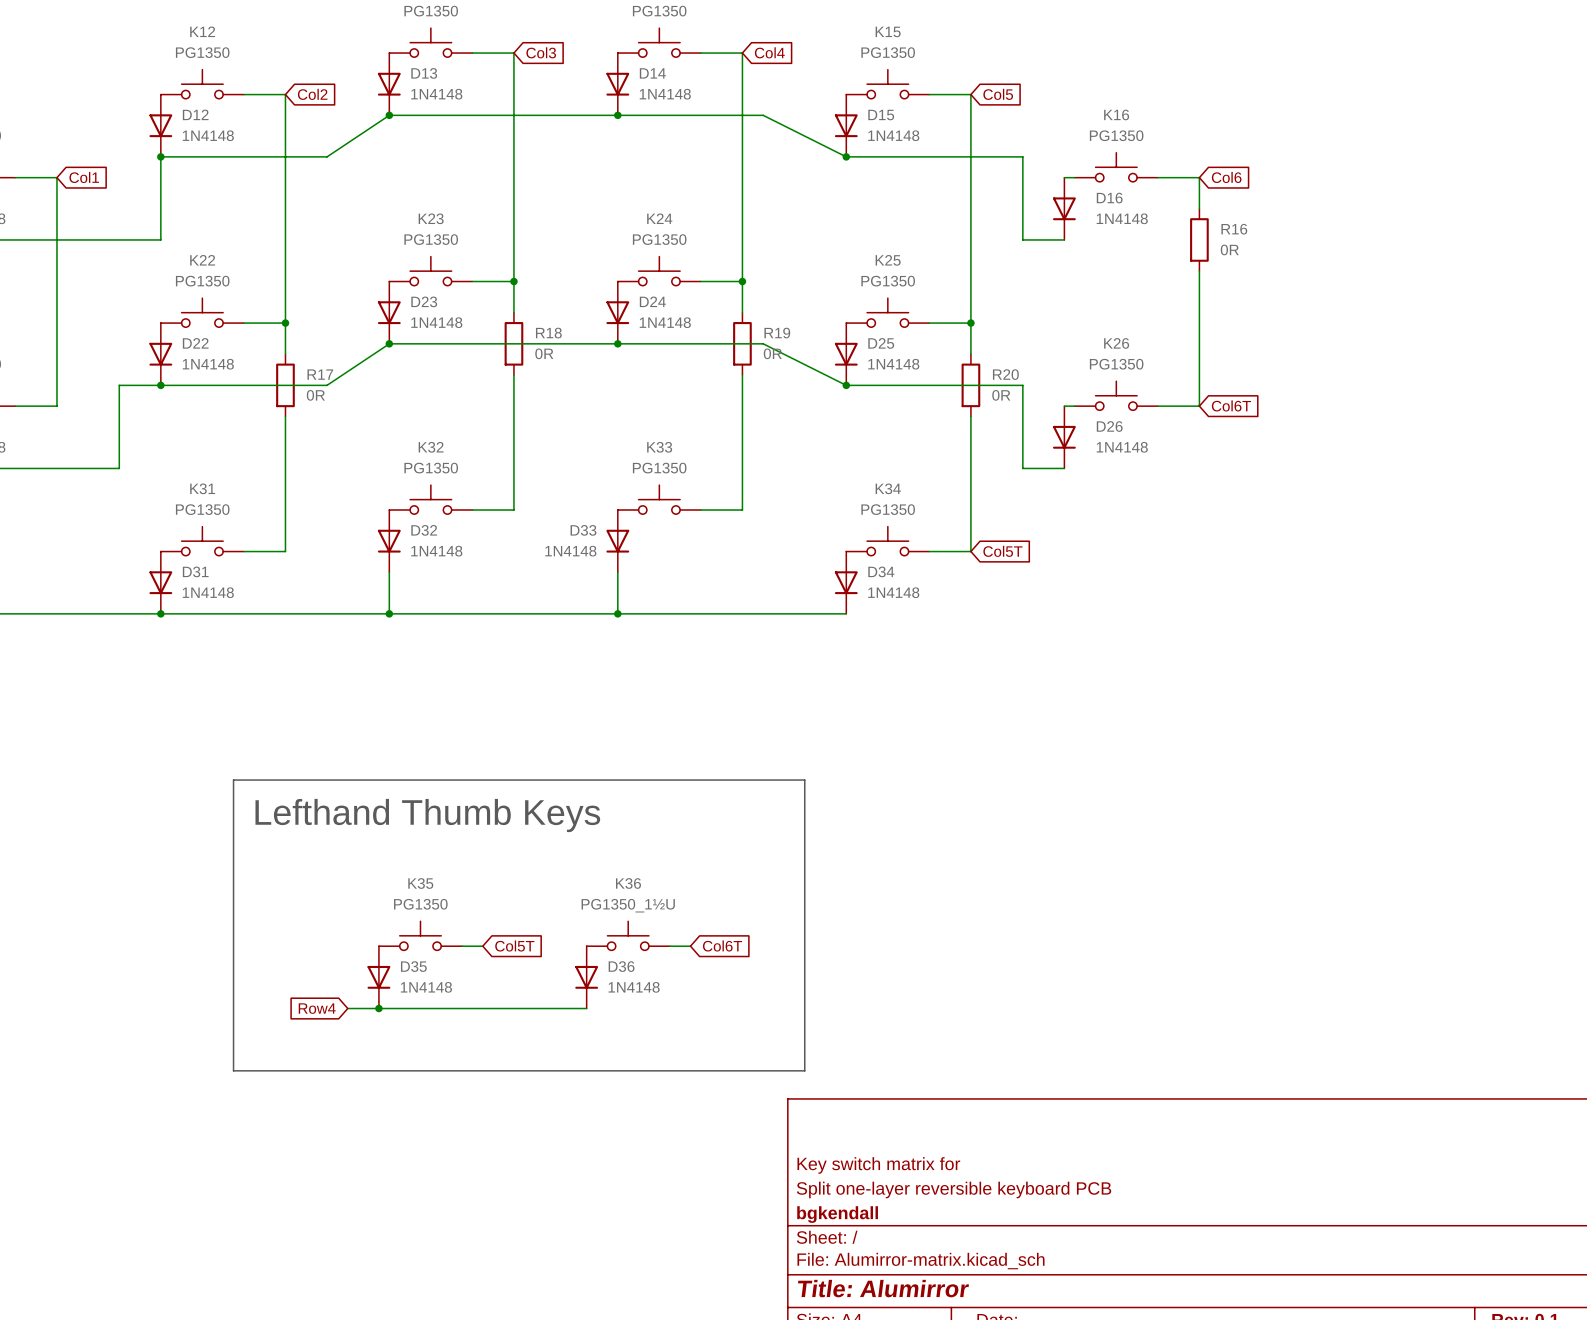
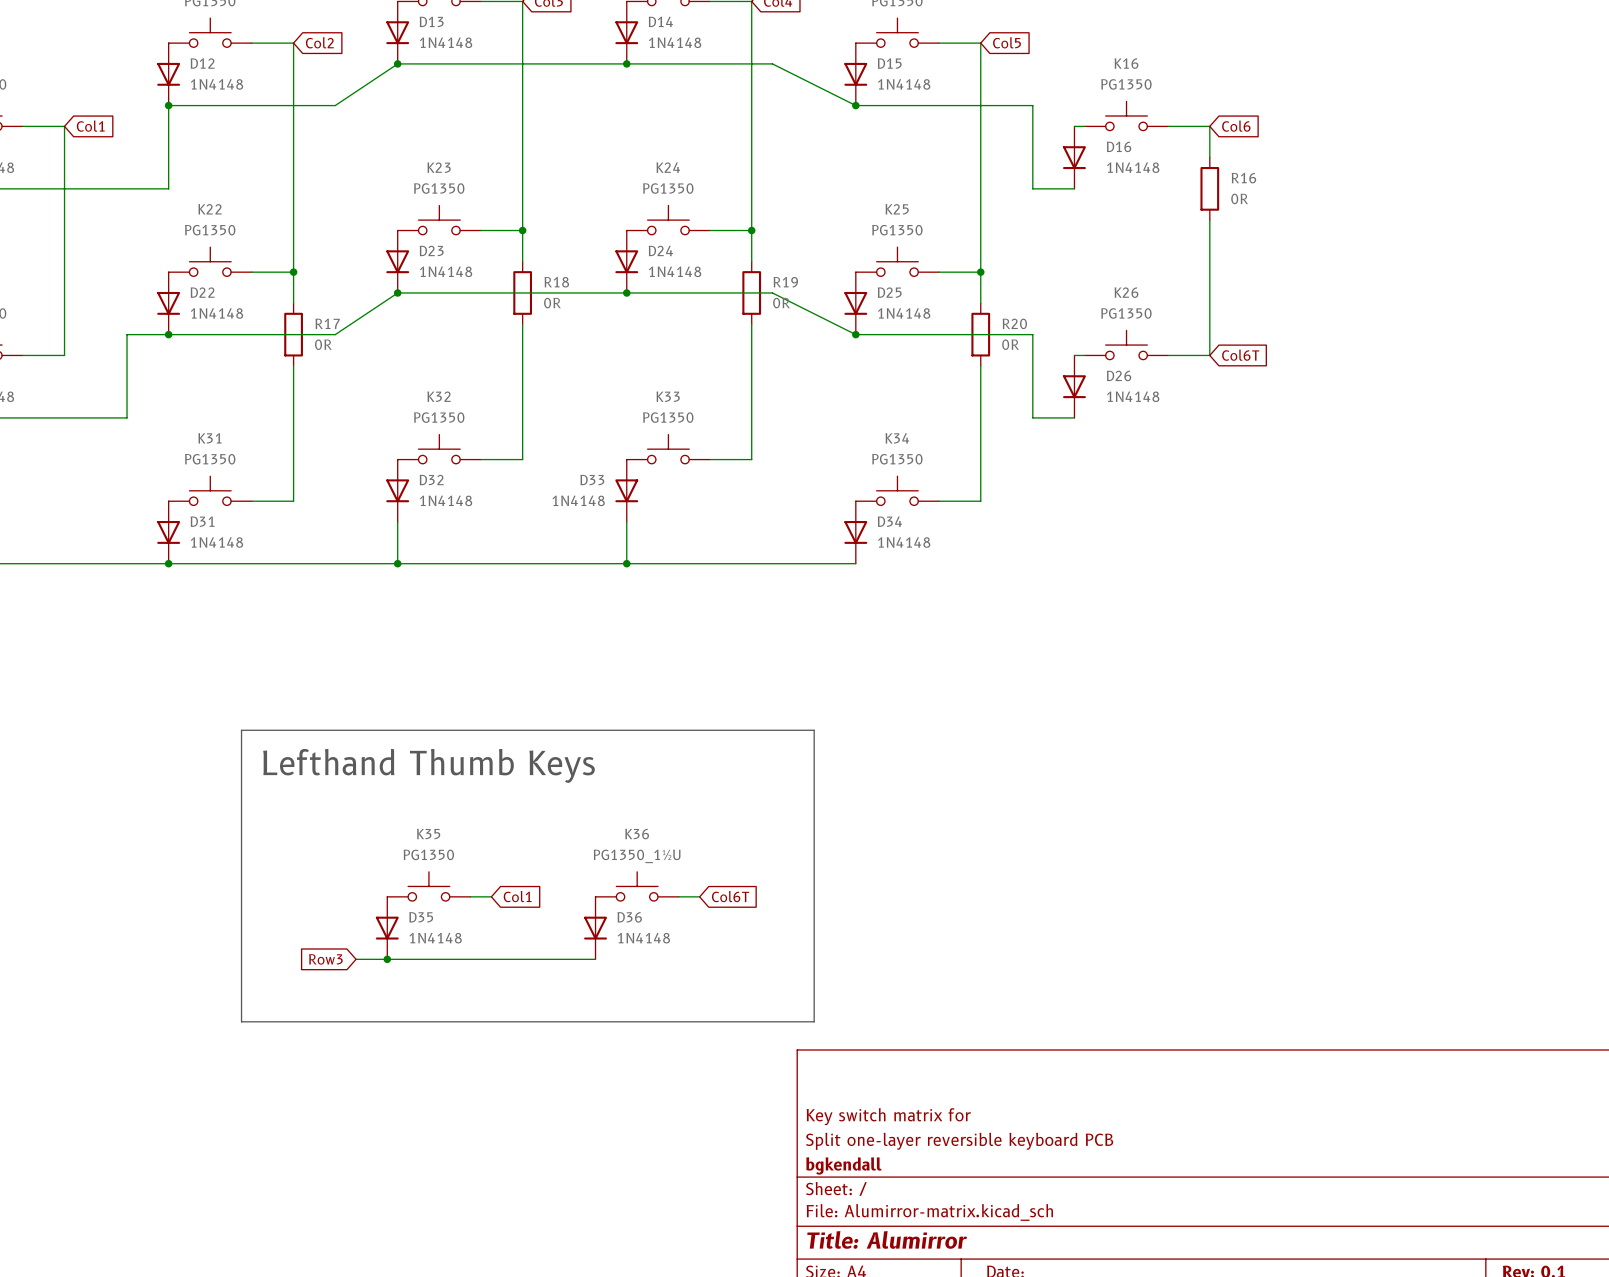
global label: Col5T (1002, 551) -> none
global label: Col5T (514, 946) -> Col1 (517, 896)
global label: Row4 (317, 1008) -> Row3 (325, 959)

